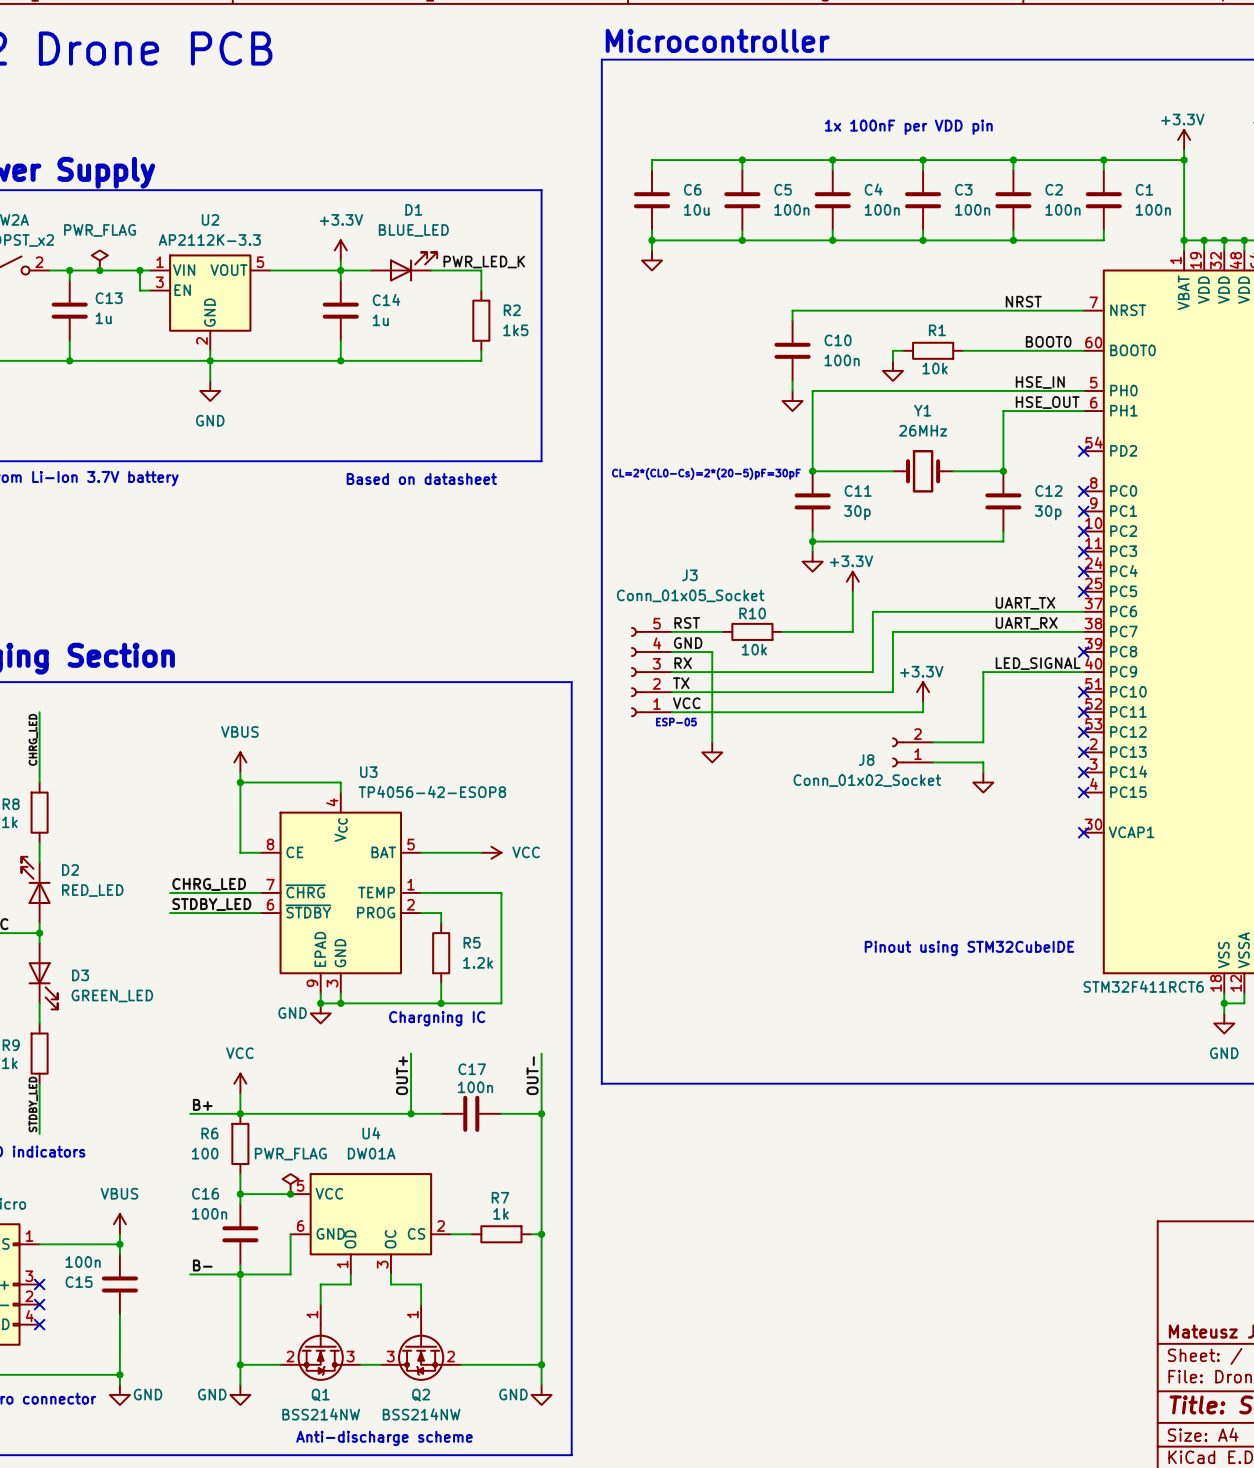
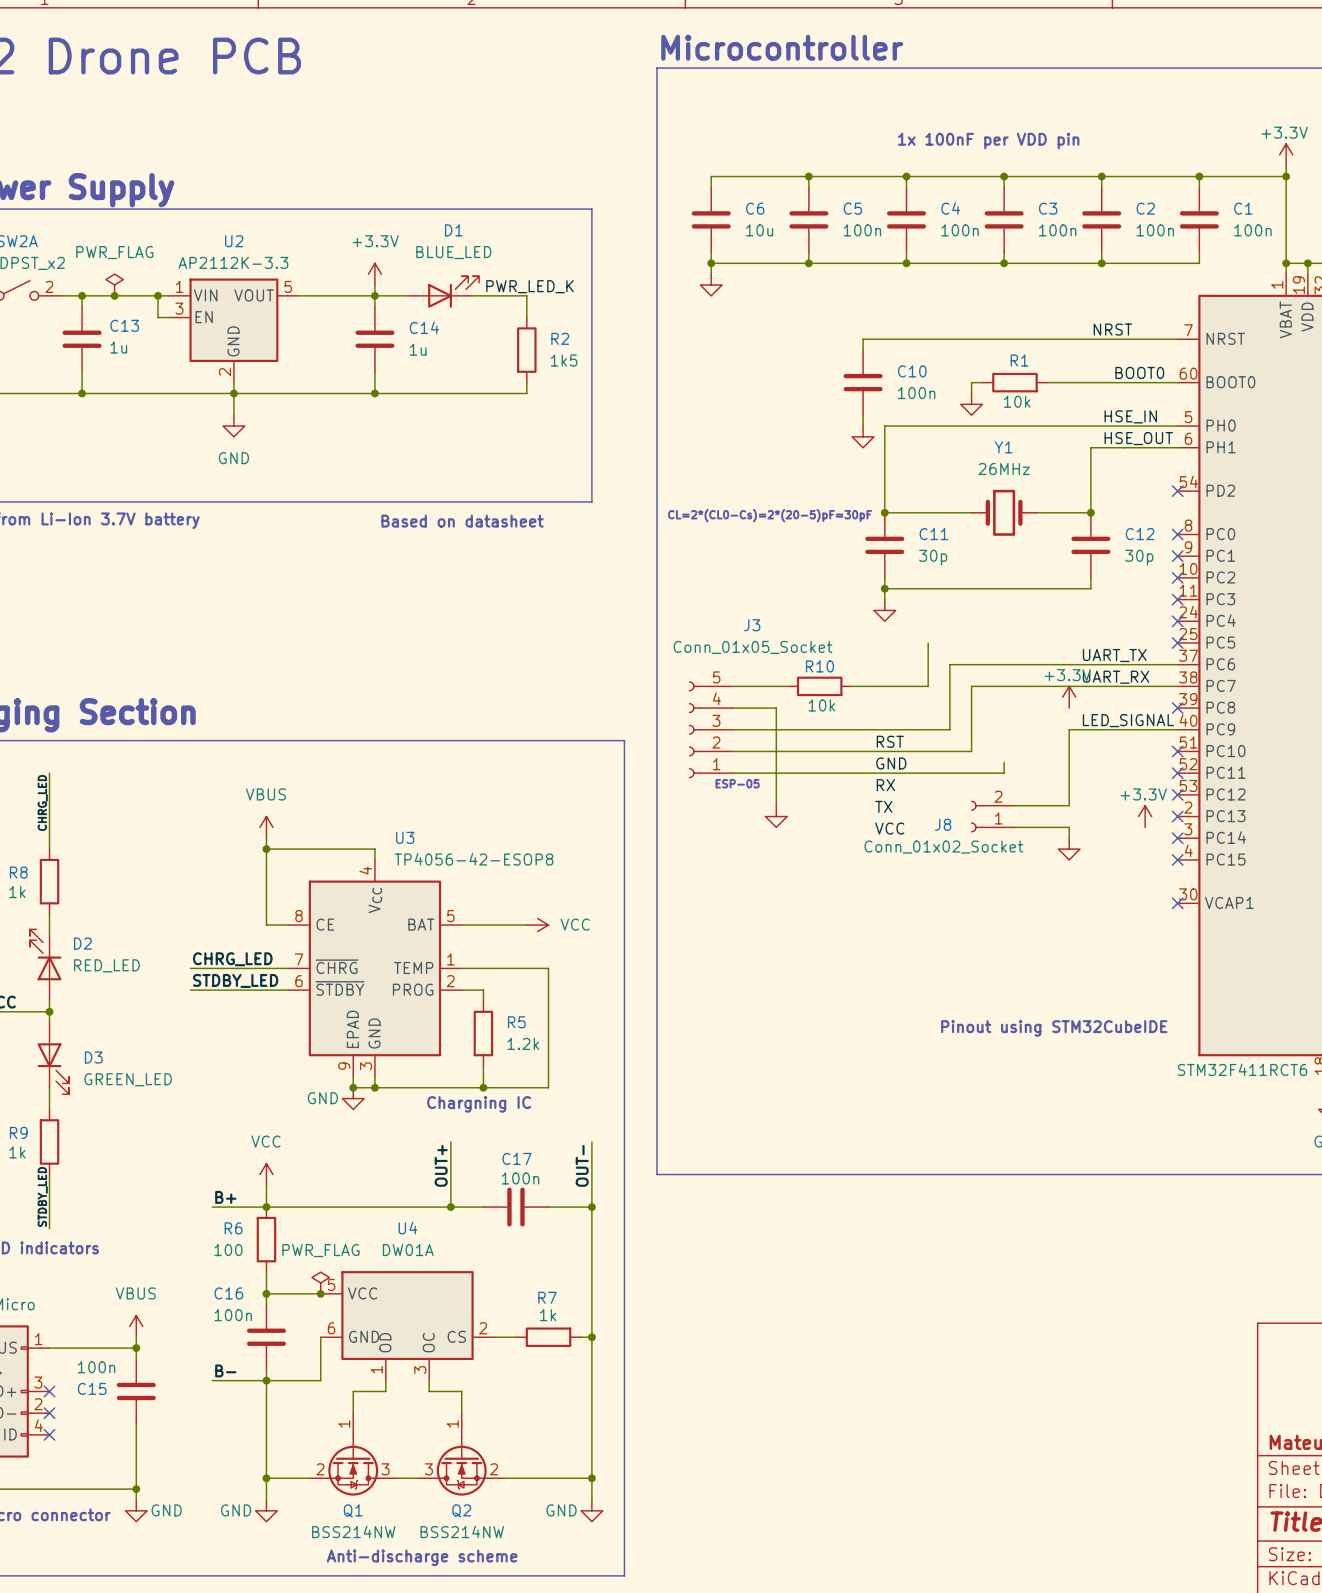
power symbol: +3.3V (852, 581) -> none
label position: RST (687, 622) -> RST (890, 741)
power symbol: none -> +3.3V (1069, 697)
label position: GND (688, 643) -> GND (891, 763)
label position: RX (683, 663) -> RX (885, 785)
label position: TX (681, 683) -> TX (883, 806)
power symbol: +3.3V (923, 692) -> none
label position: VCC (686, 703) -> VCC (889, 828)
power symbol: none -> +3.3V (1145, 816)

